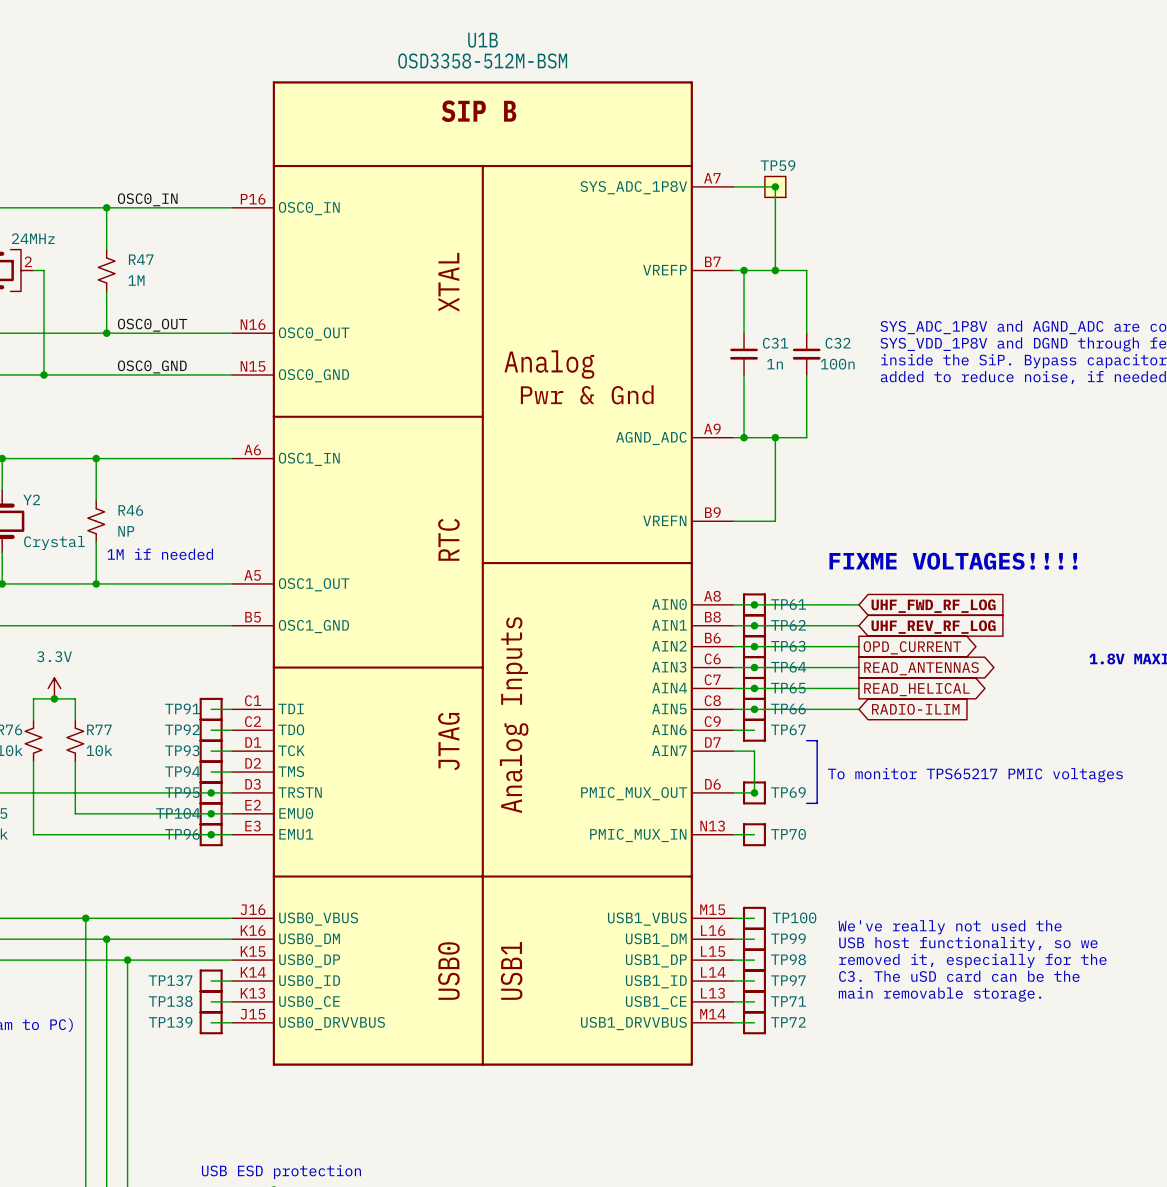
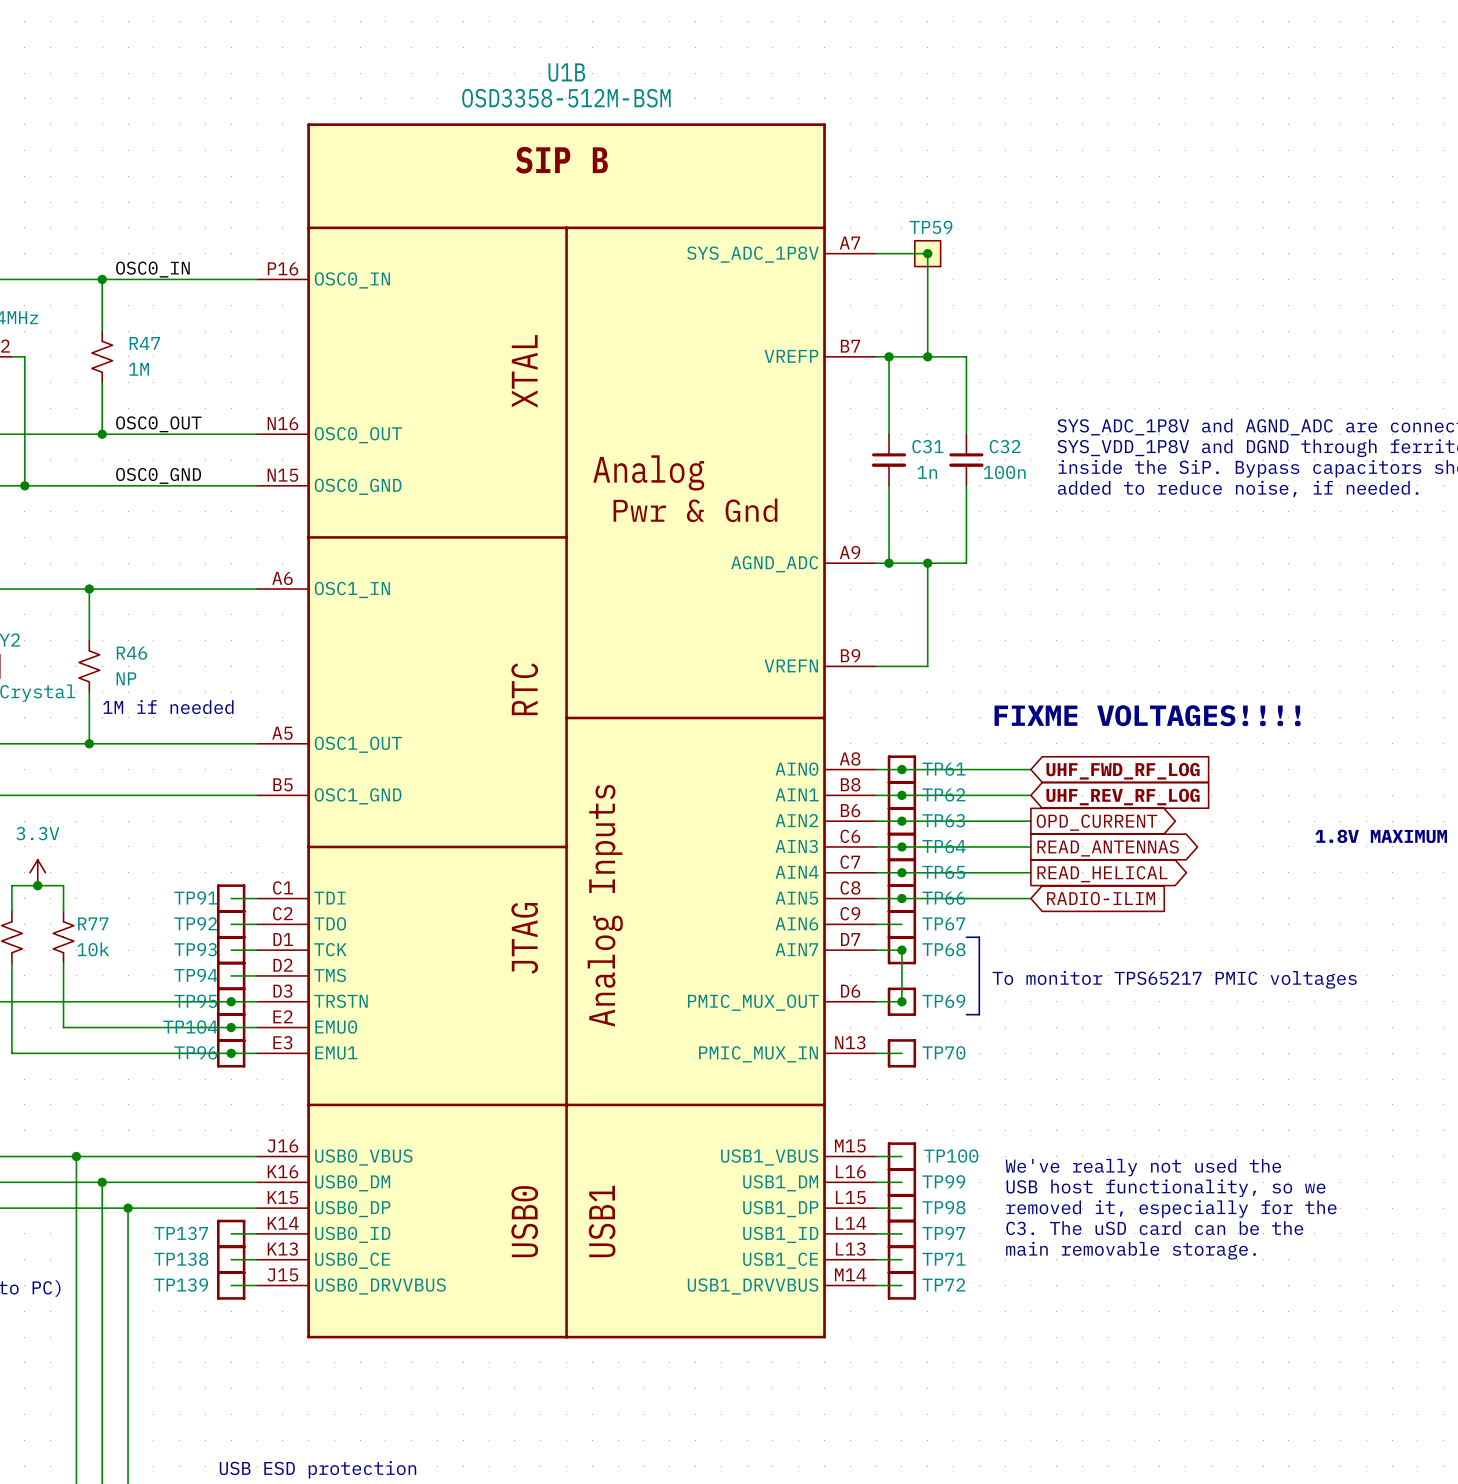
junction: none -> (901, 950)
TP68: none -> (901, 950)

